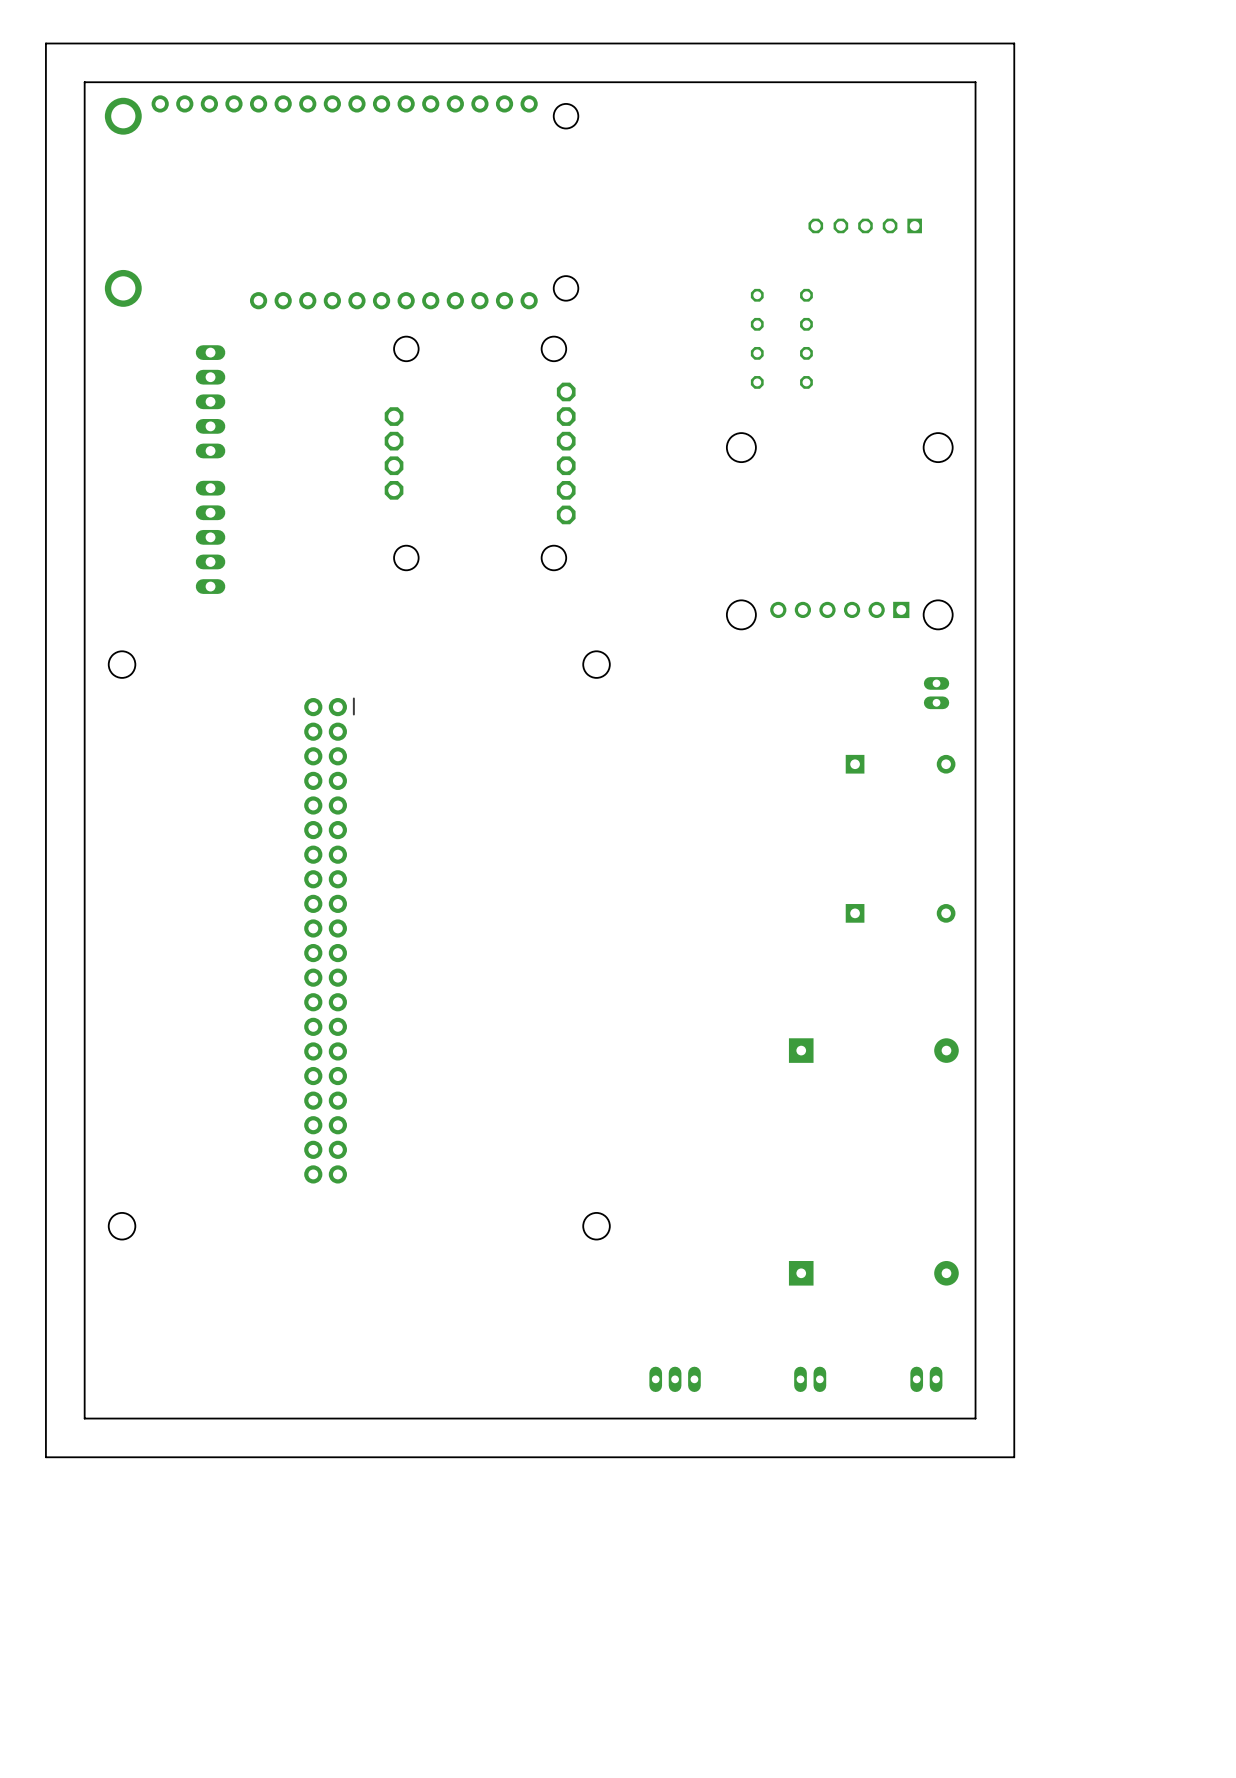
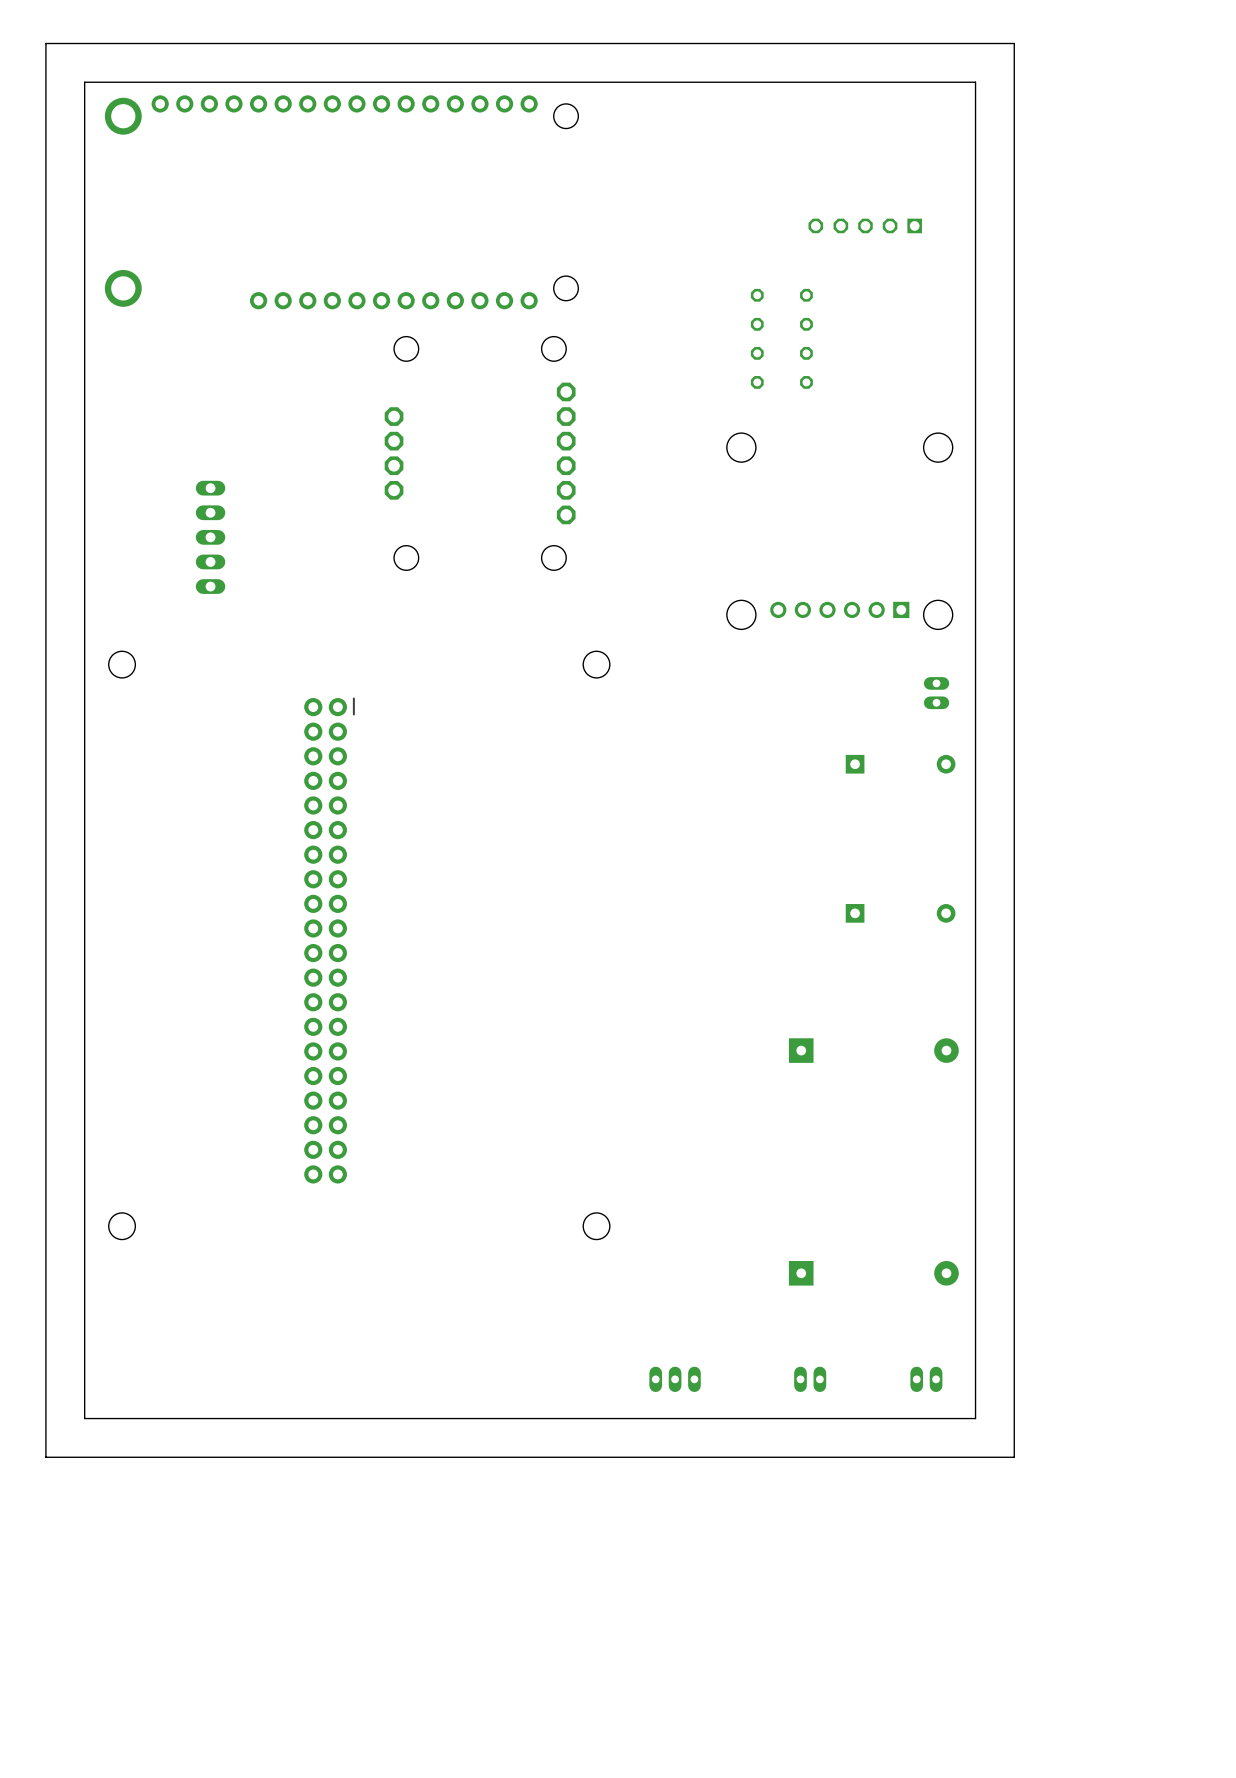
part: (210, 401) -> none

